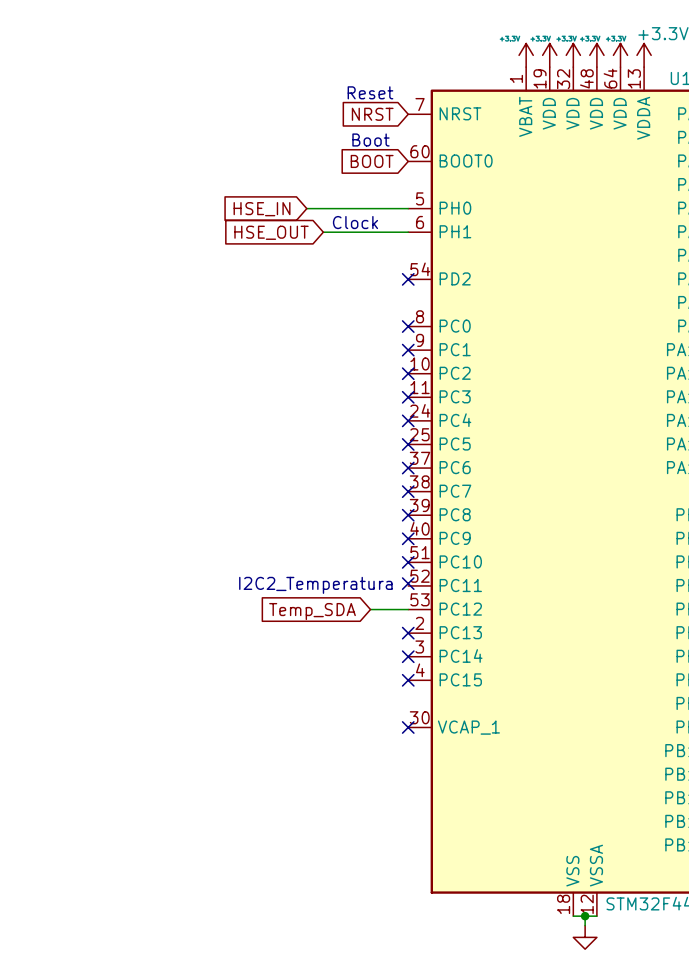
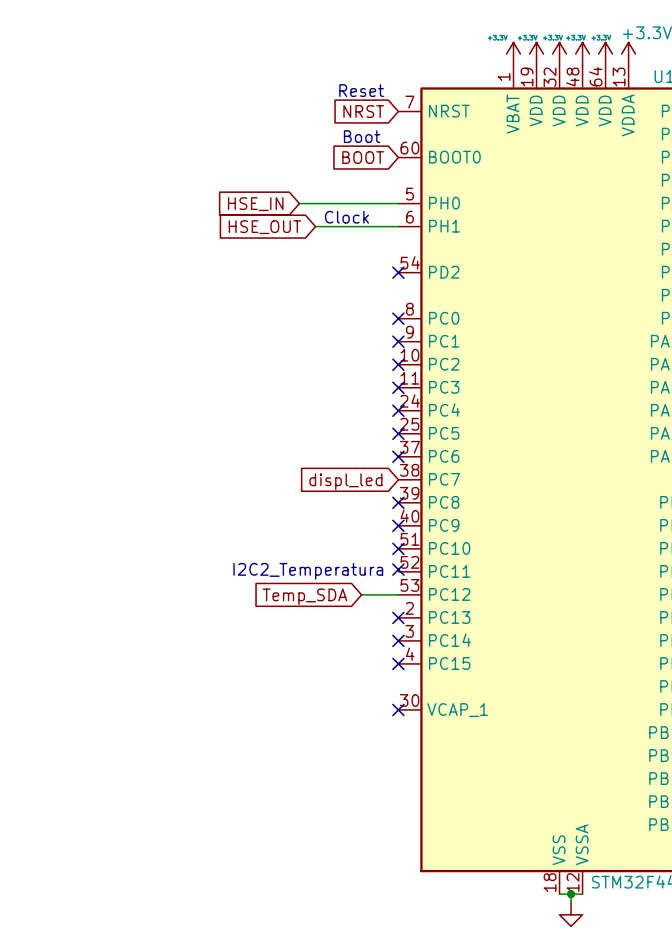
no-connect mark: (408, 491) -> none
global label: none -> displ_led (345, 481)

